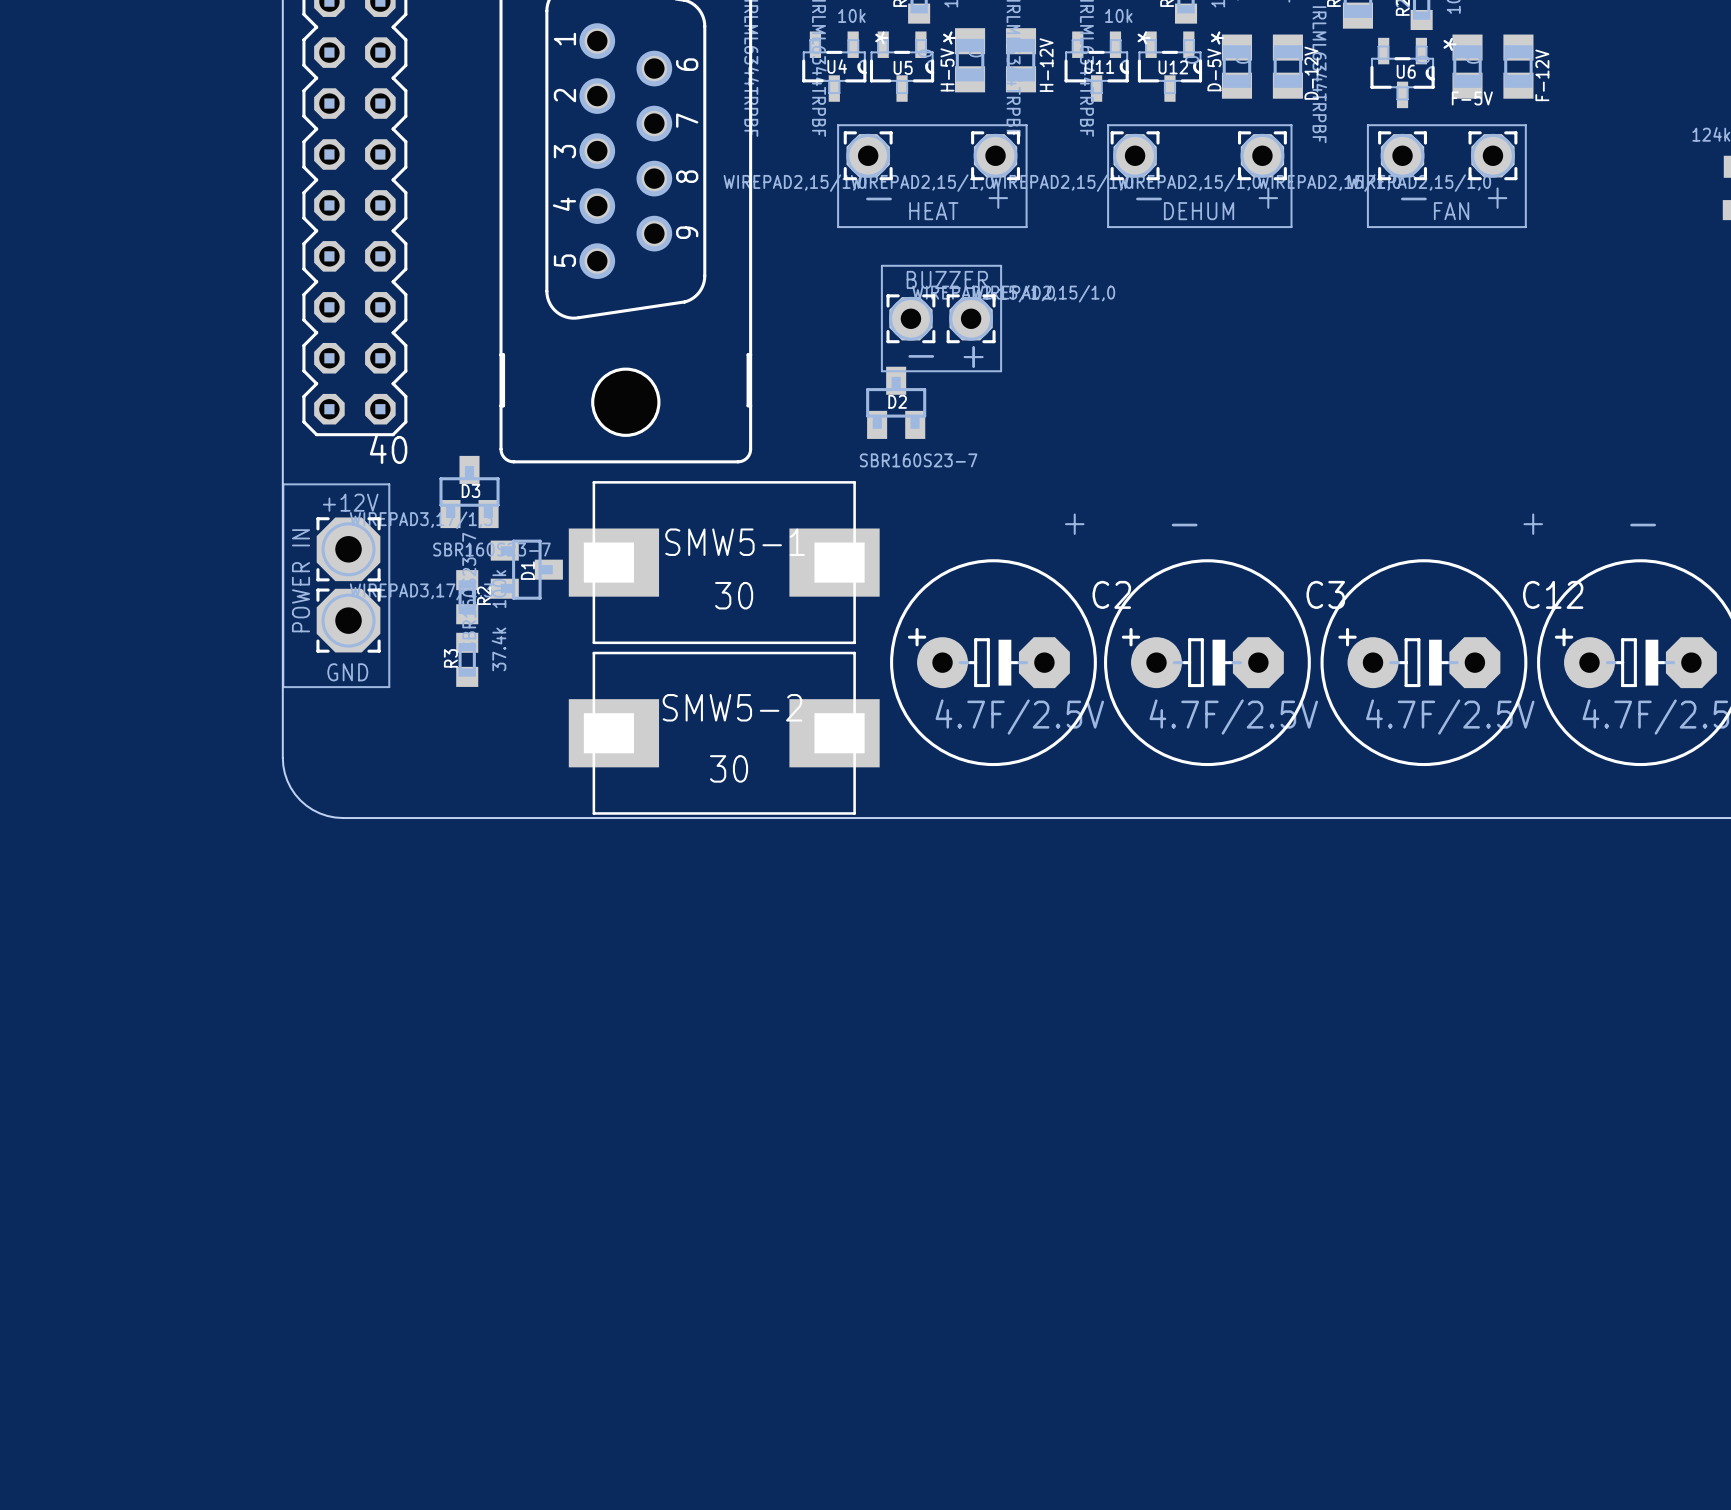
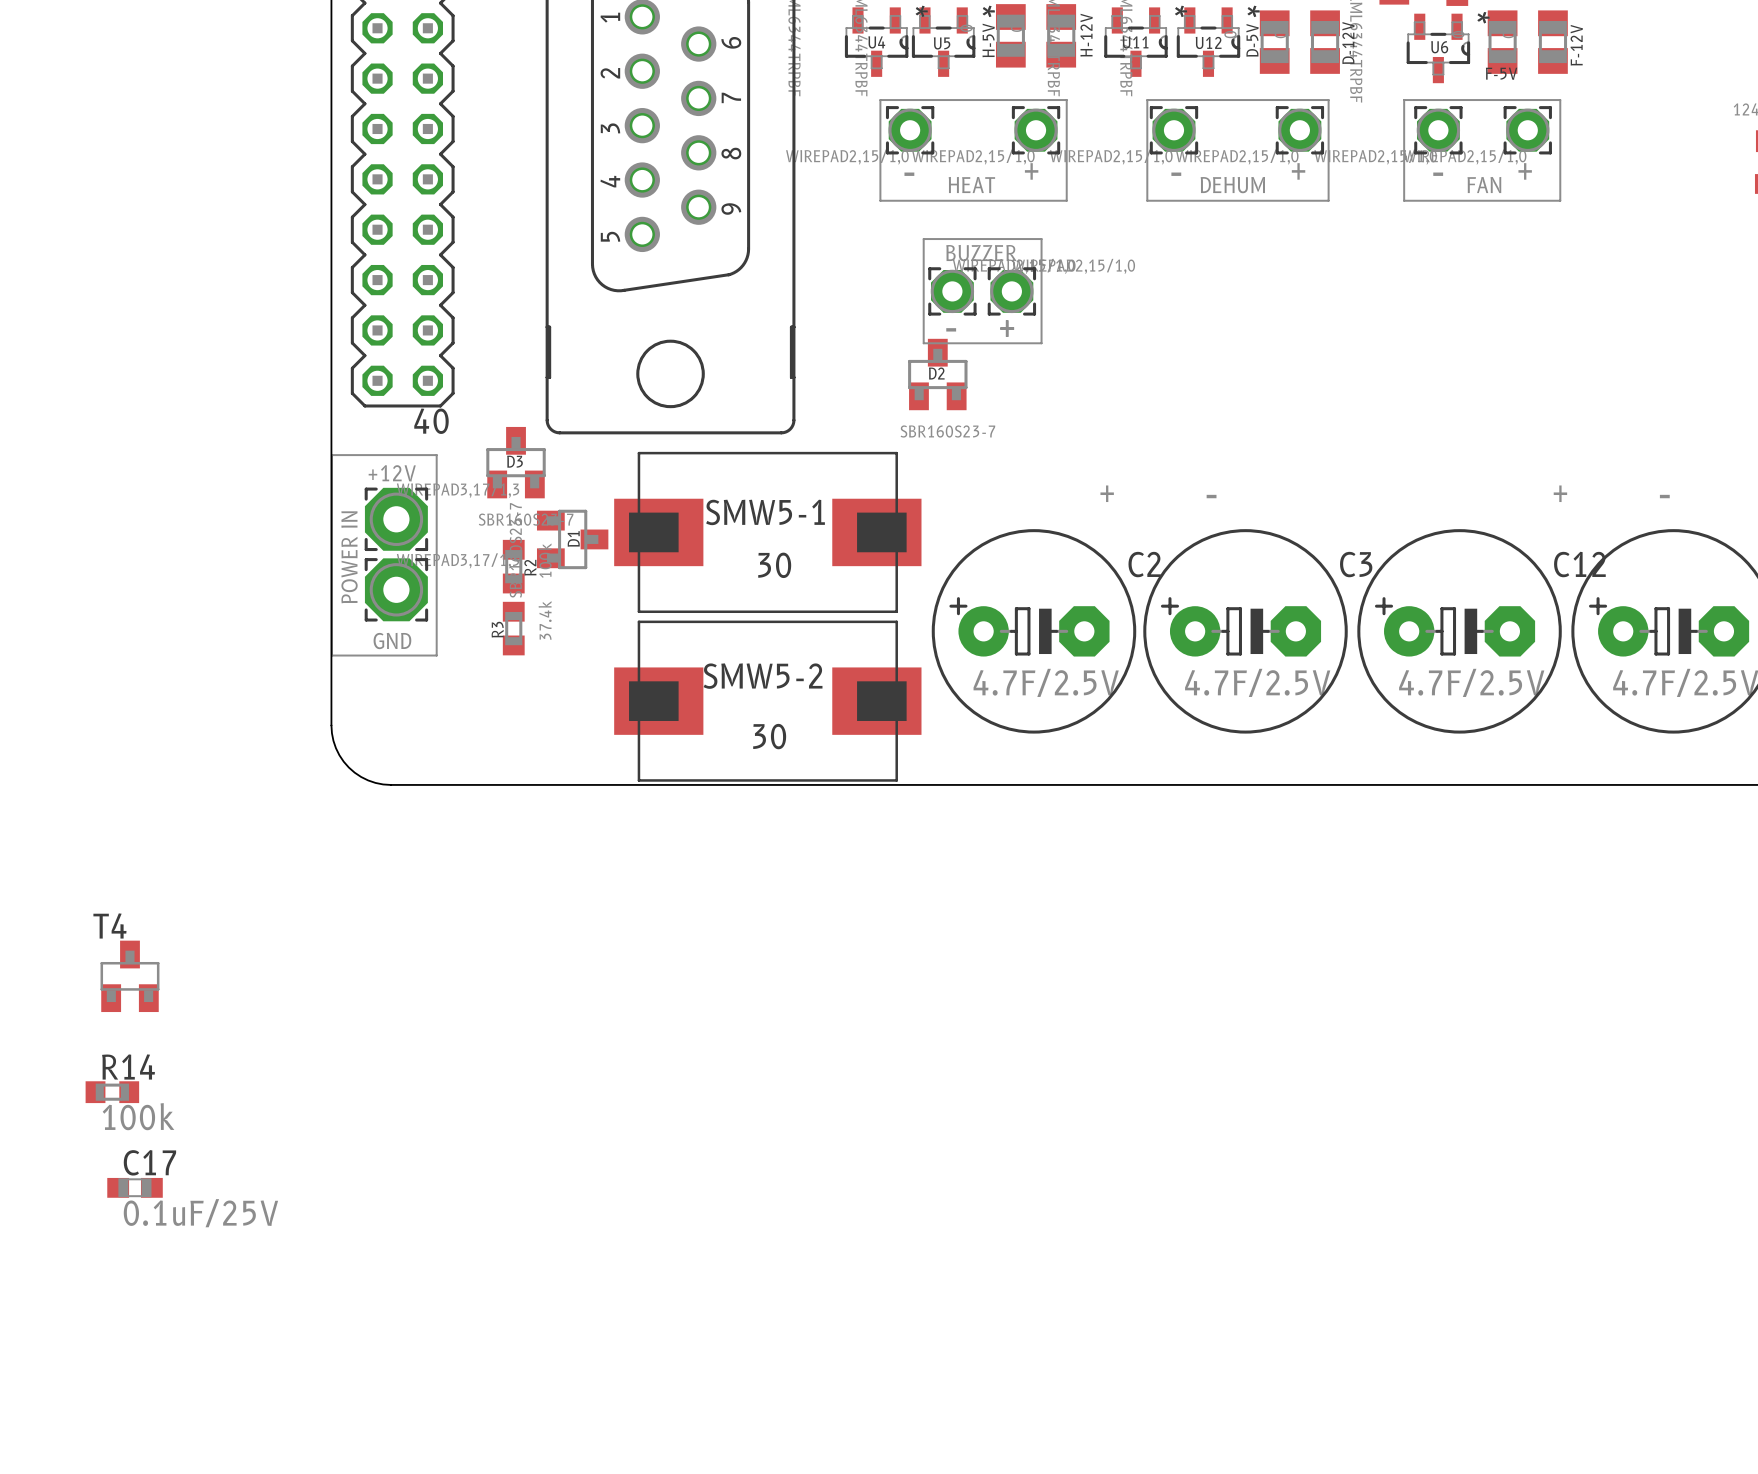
T4: none -> (129, 976)
R14: none -> 100k (112, 1092)
C17: none -> 0.1uF/25V (135, 1187)

